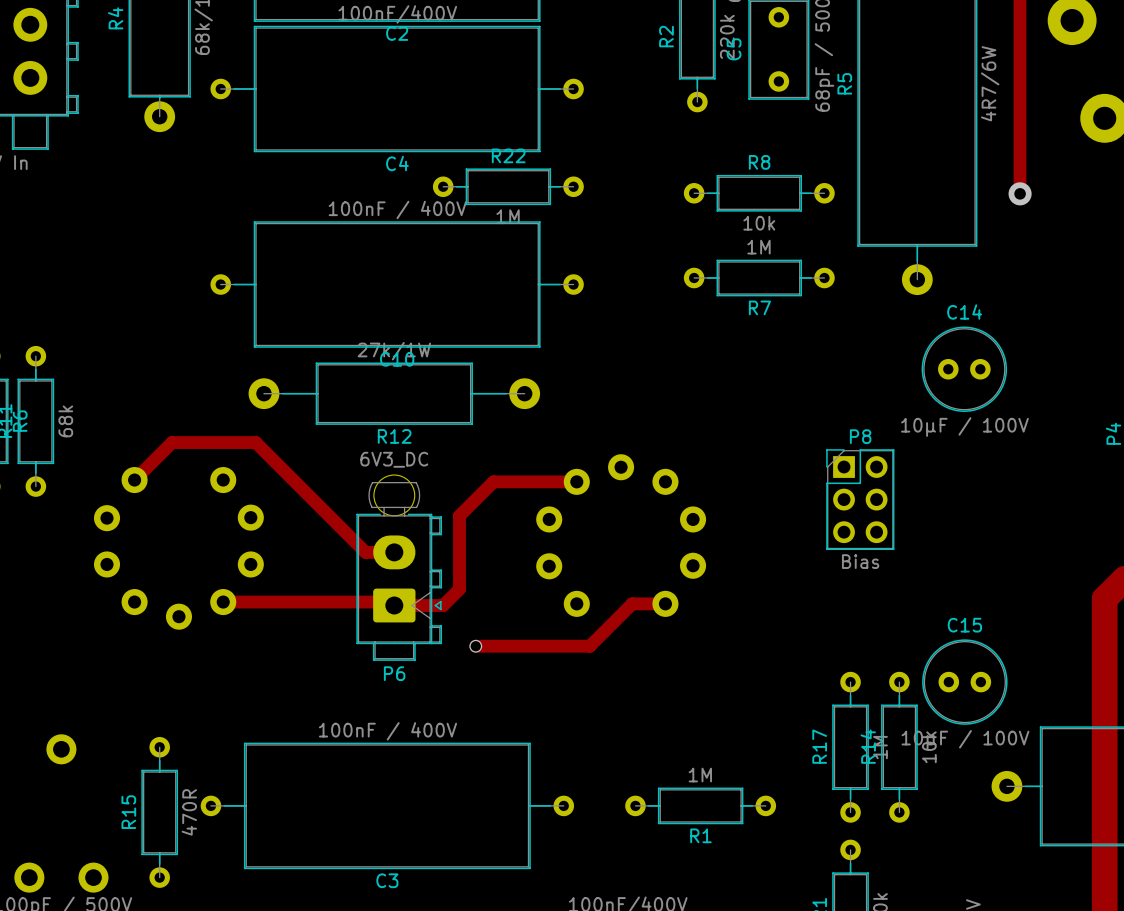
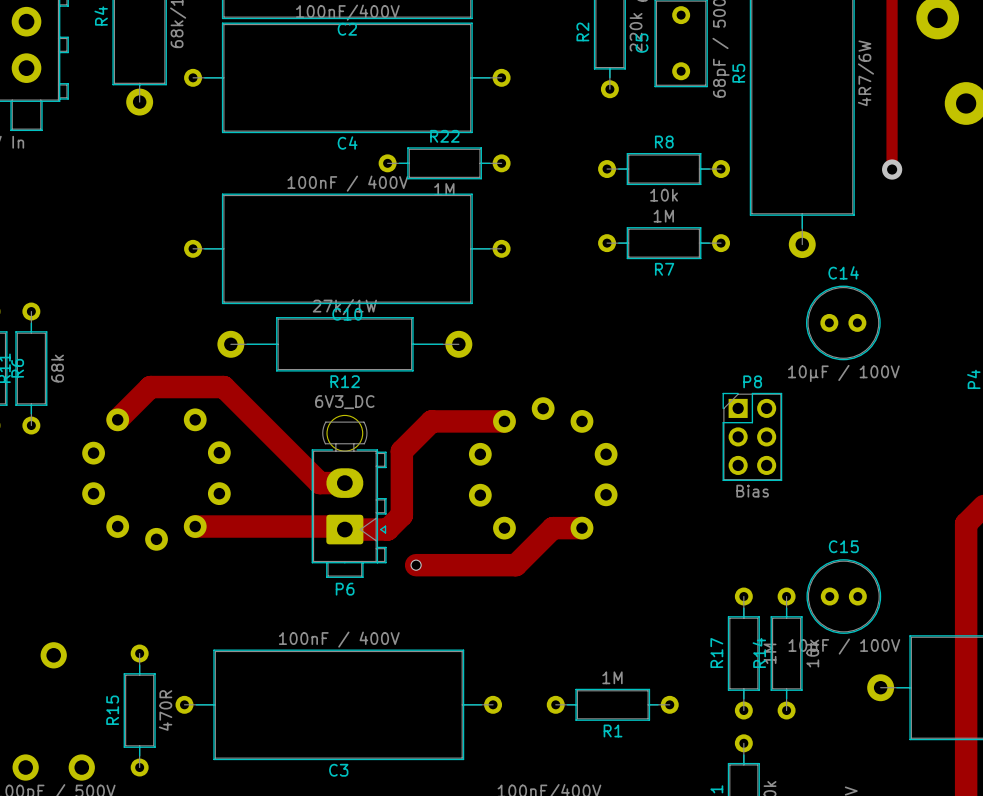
track width: thin (134, 480) (172, 442) (255, 442) (365, 552) (394, 552) -> thick (117, 419) (150, 387) (223, 387) (319, 483) (344, 483)
track width: thin (576, 481) (493, 481) (459, 515) (459, 589) (443, 605) (394, 605) (390, 602) (223, 602) -> thick (504, 421) (431, 421) (401, 451) (401, 515) (387, 529) (344, 529) (341, 526) (195, 526)
track width: thin (665, 603) (632, 603) (589, 646) (475, 646) -> thick (581, 528) (552, 528) (515, 565) (416, 565)

